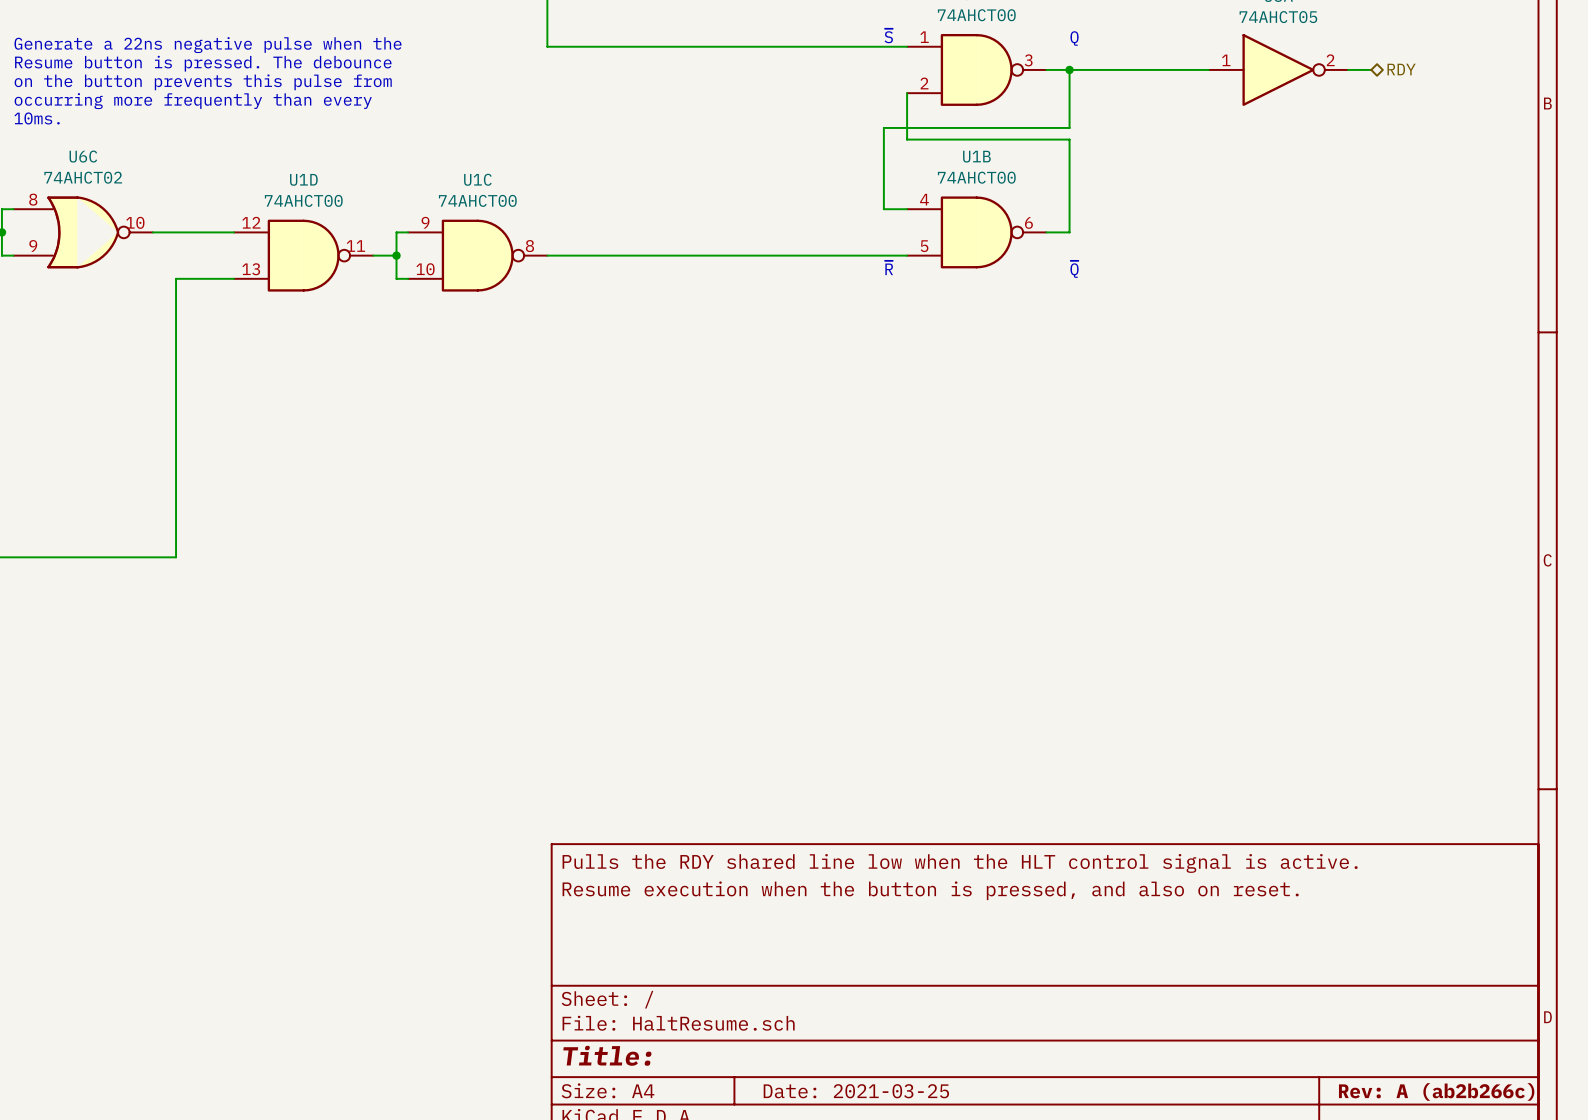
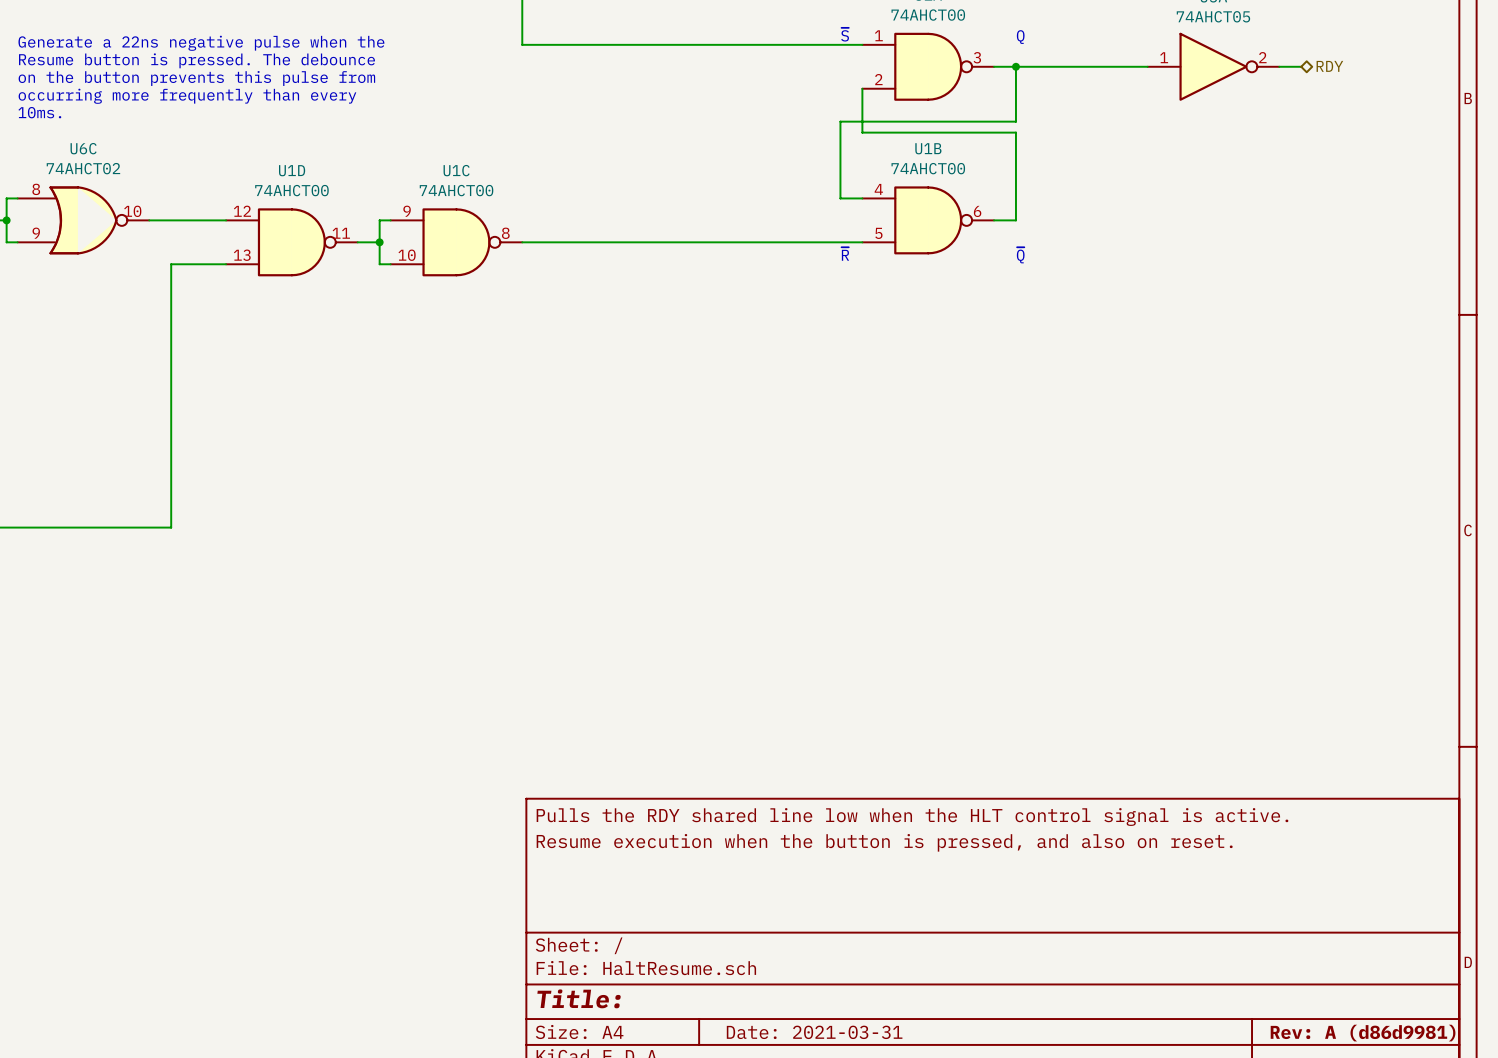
title block: Date: 2021-03-25 (856, 1091) -> Date: 2021-03-31 (814, 1032)
title block: Rev: A (ab2b266c) (1436, 1091) -> Rev: A (d86d9981) (1363, 1033)

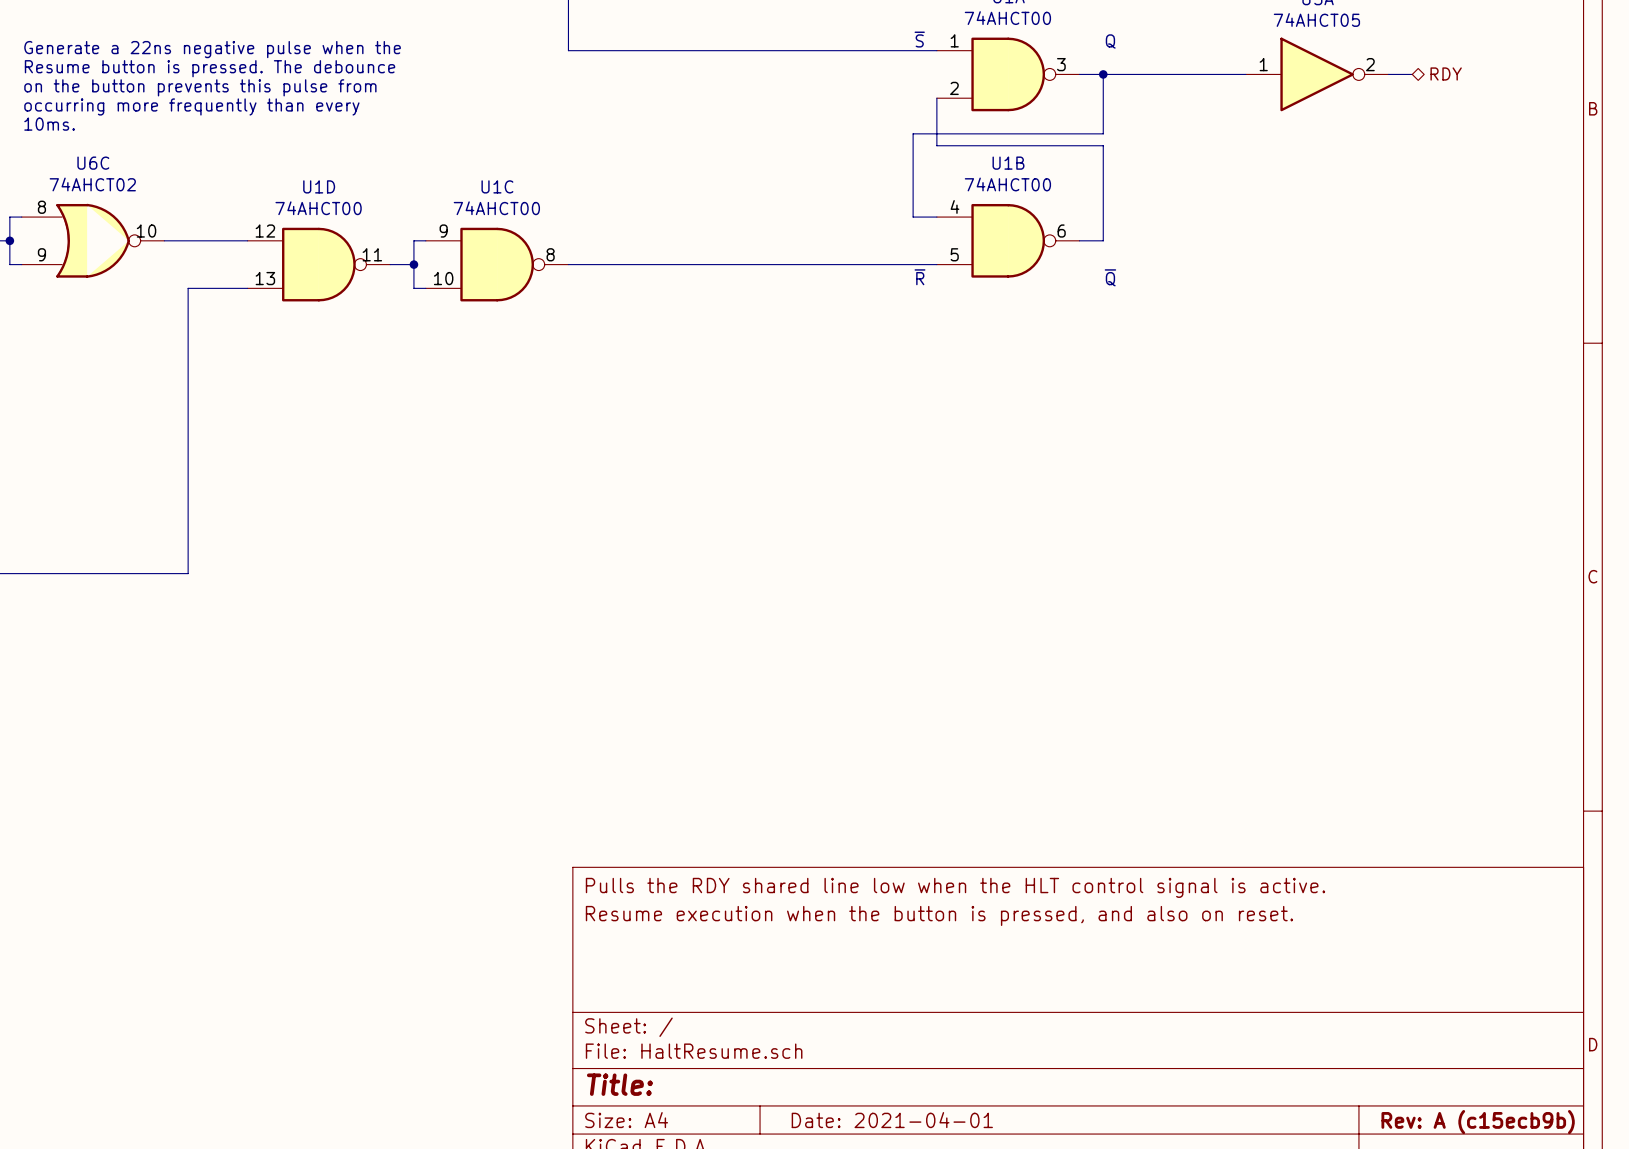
title block: Date: 2021-03-31 (814, 1032) -> Date: 2021-04-01 (892, 1120)
title block: Rev: A (d86d9981) (1363, 1033) -> Rev: A (c15ecb9b) (1478, 1122)

